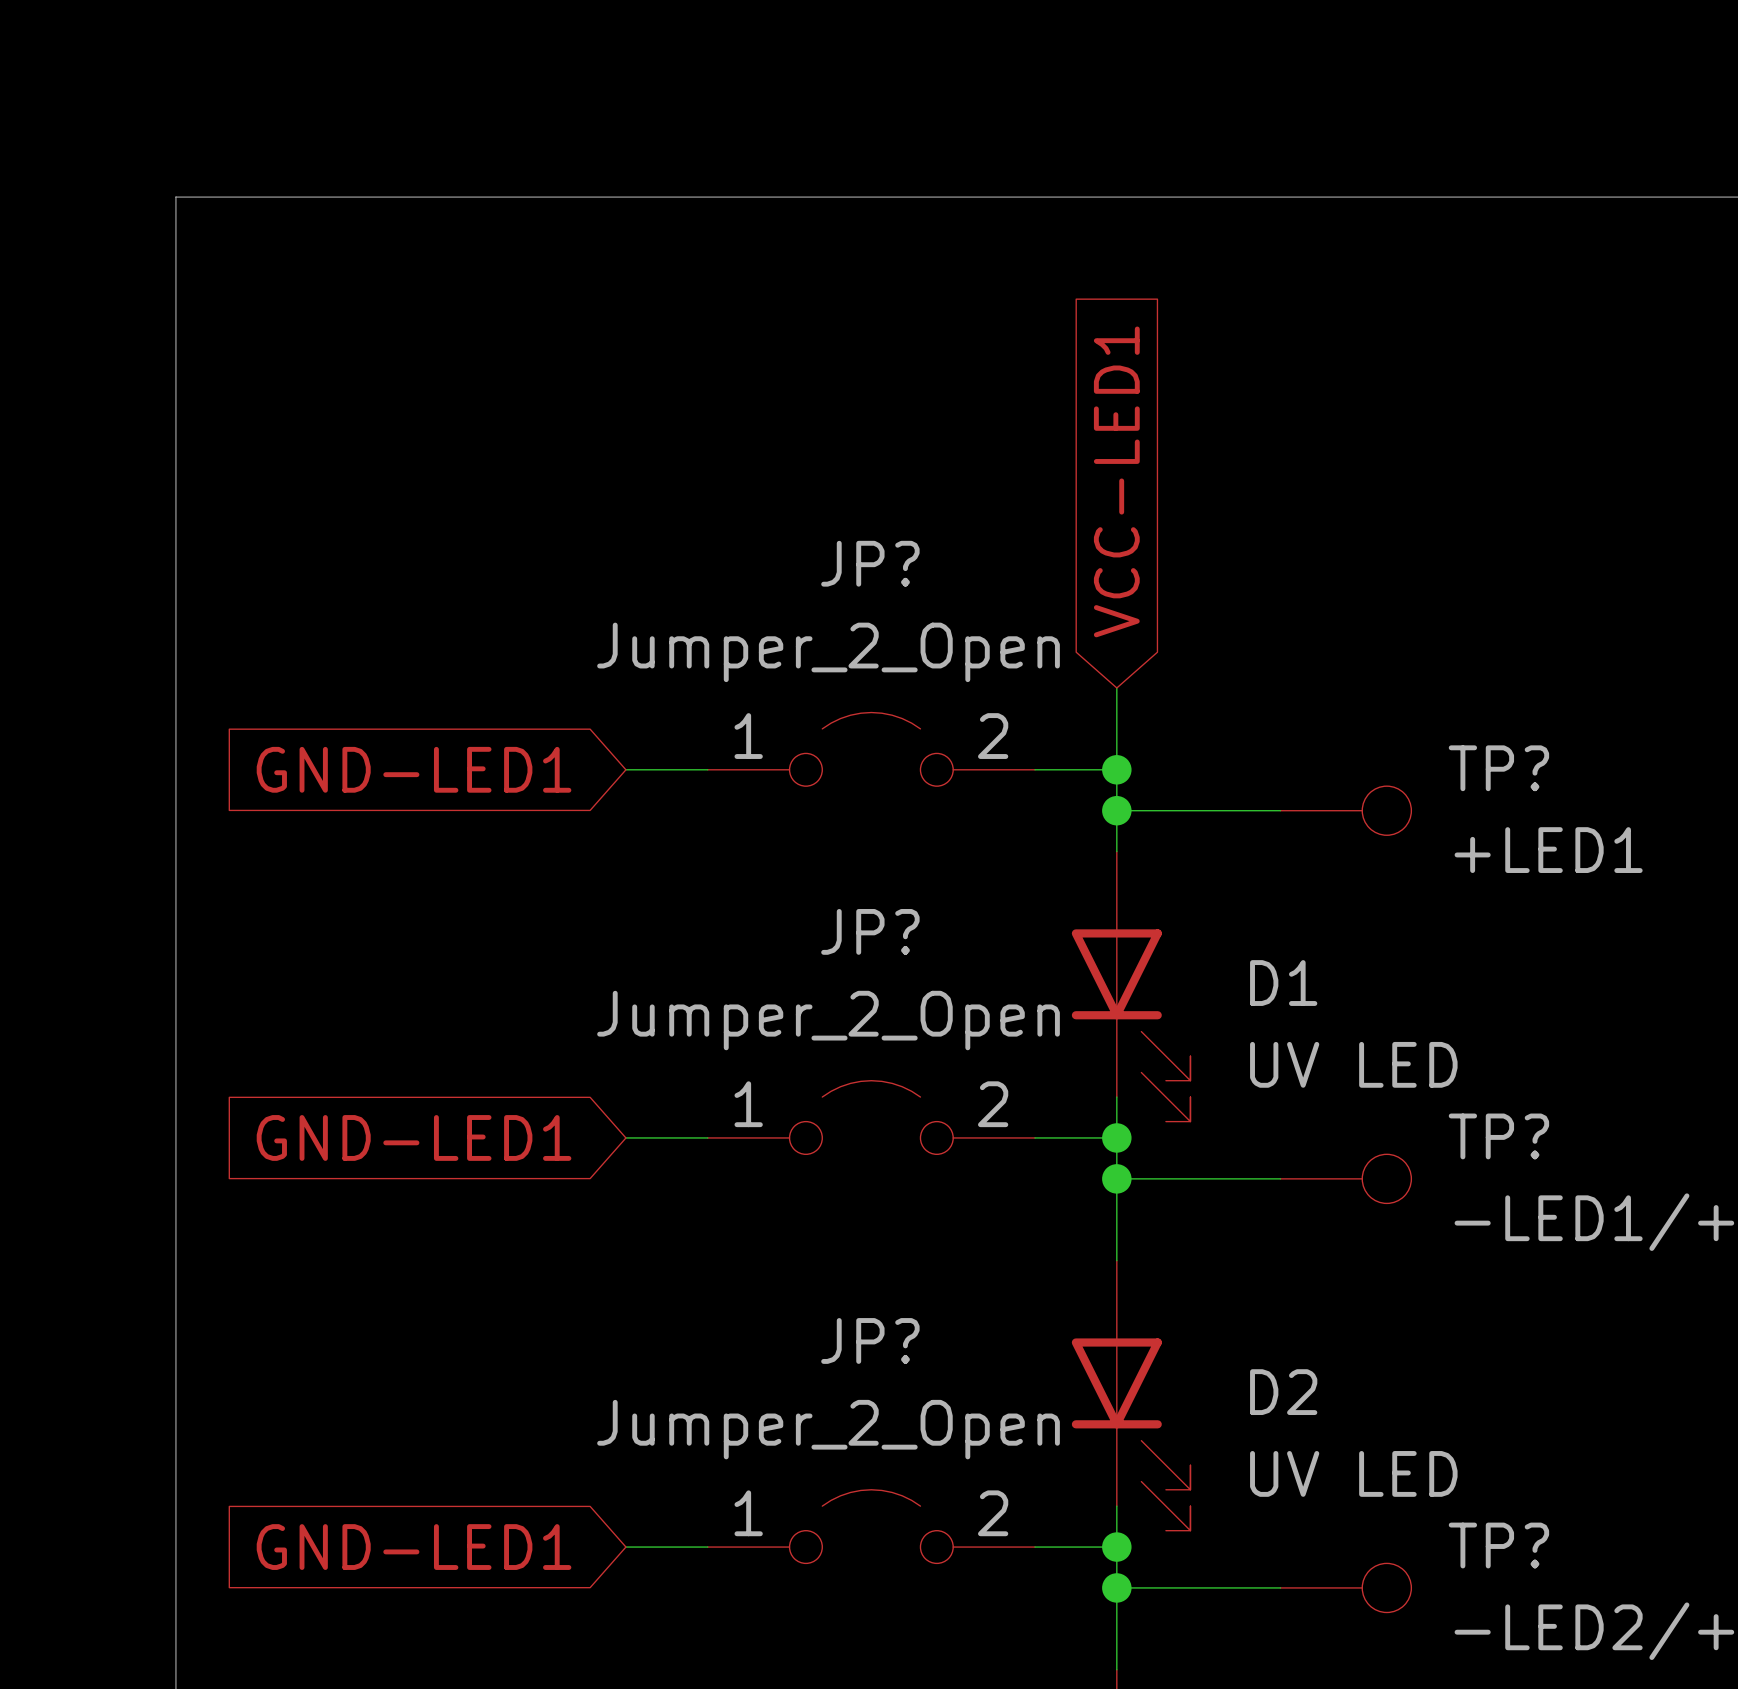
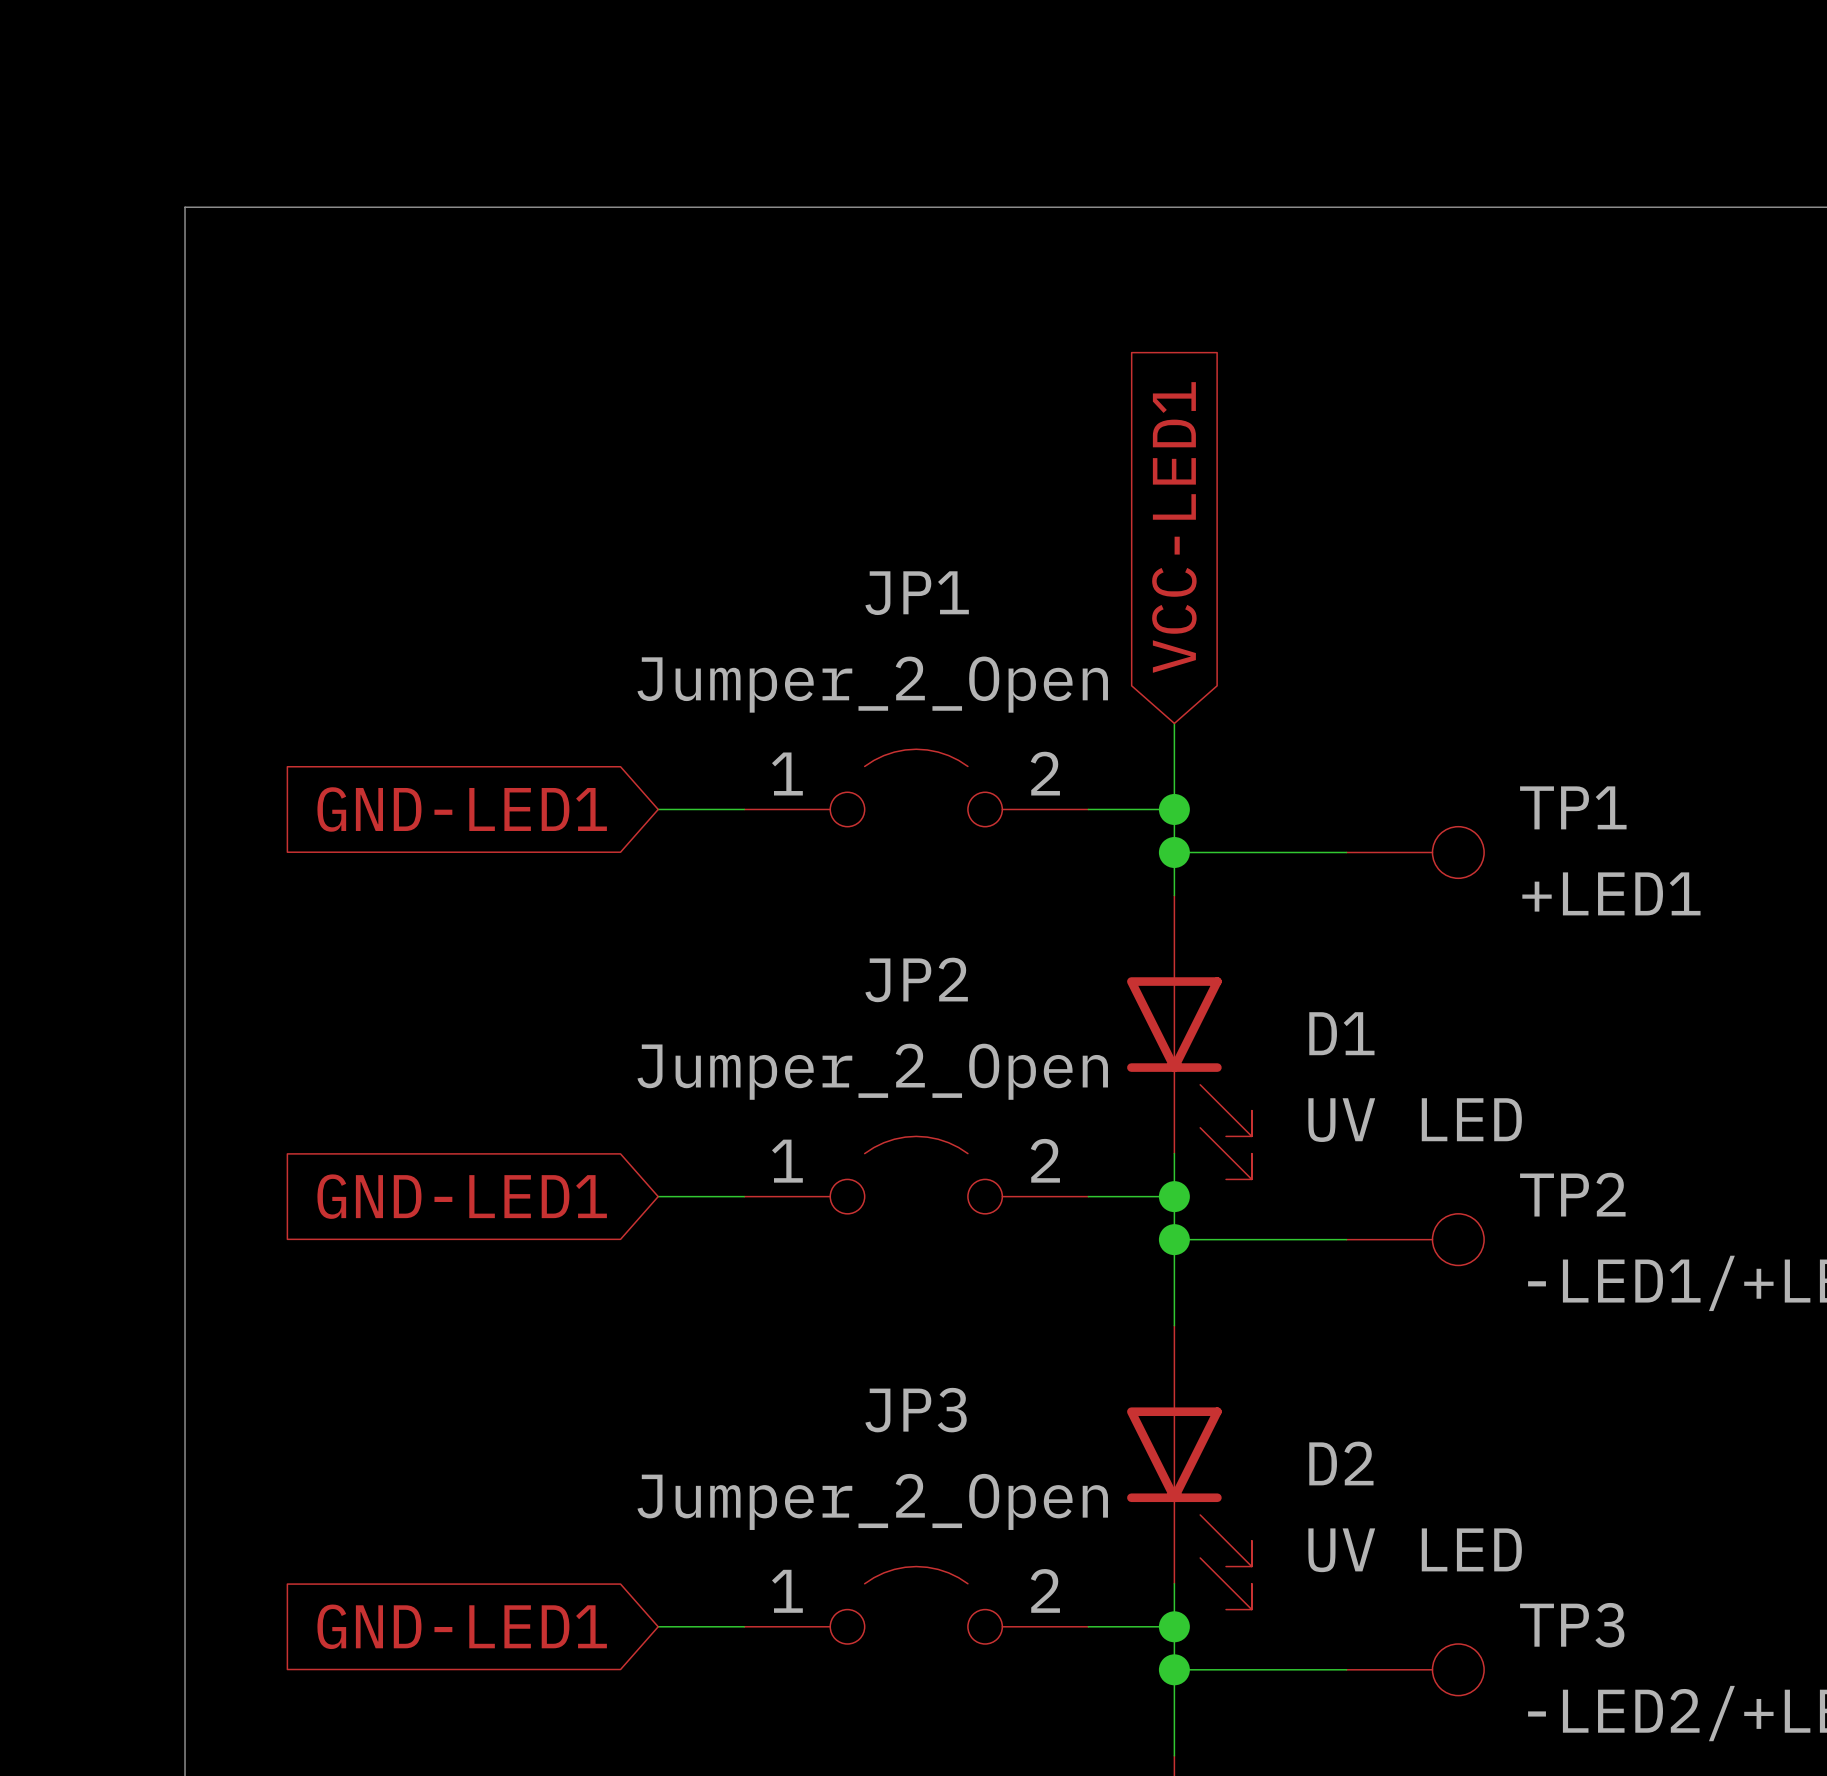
JP? name: JP? (870, 563) -> JP1 (917, 593)
TP? name: TP? (1498, 768) -> TP1 (1573, 807)
JP? name: JP? (870, 931) -> JP2 (916, 979)
TP? name: TP? (1498, 1136) -> TP2 (1572, 1194)
JP? name: JP? (870, 1340) -> JP3 (916, 1410)
TP? name: TP? (1498, 1545) -> TP3 (1572, 1625)

